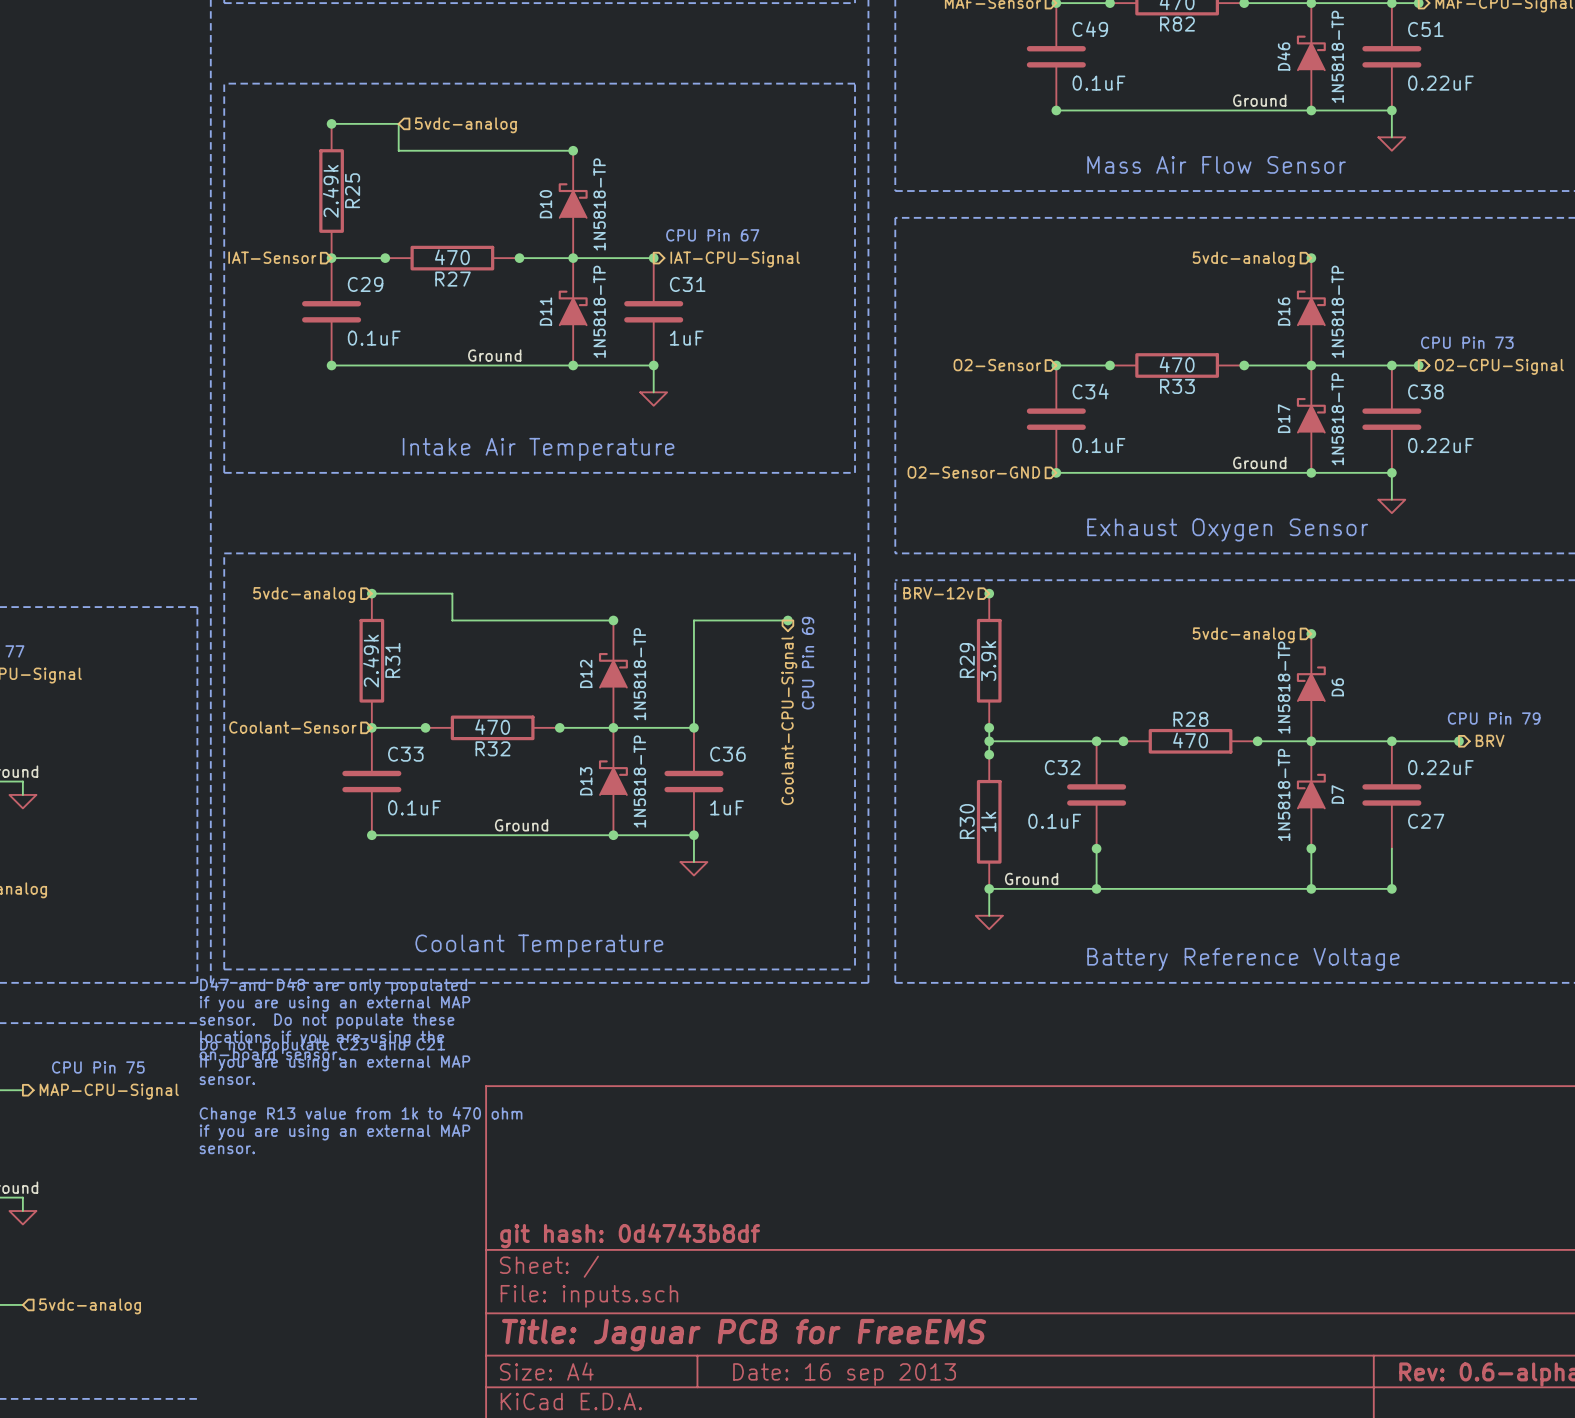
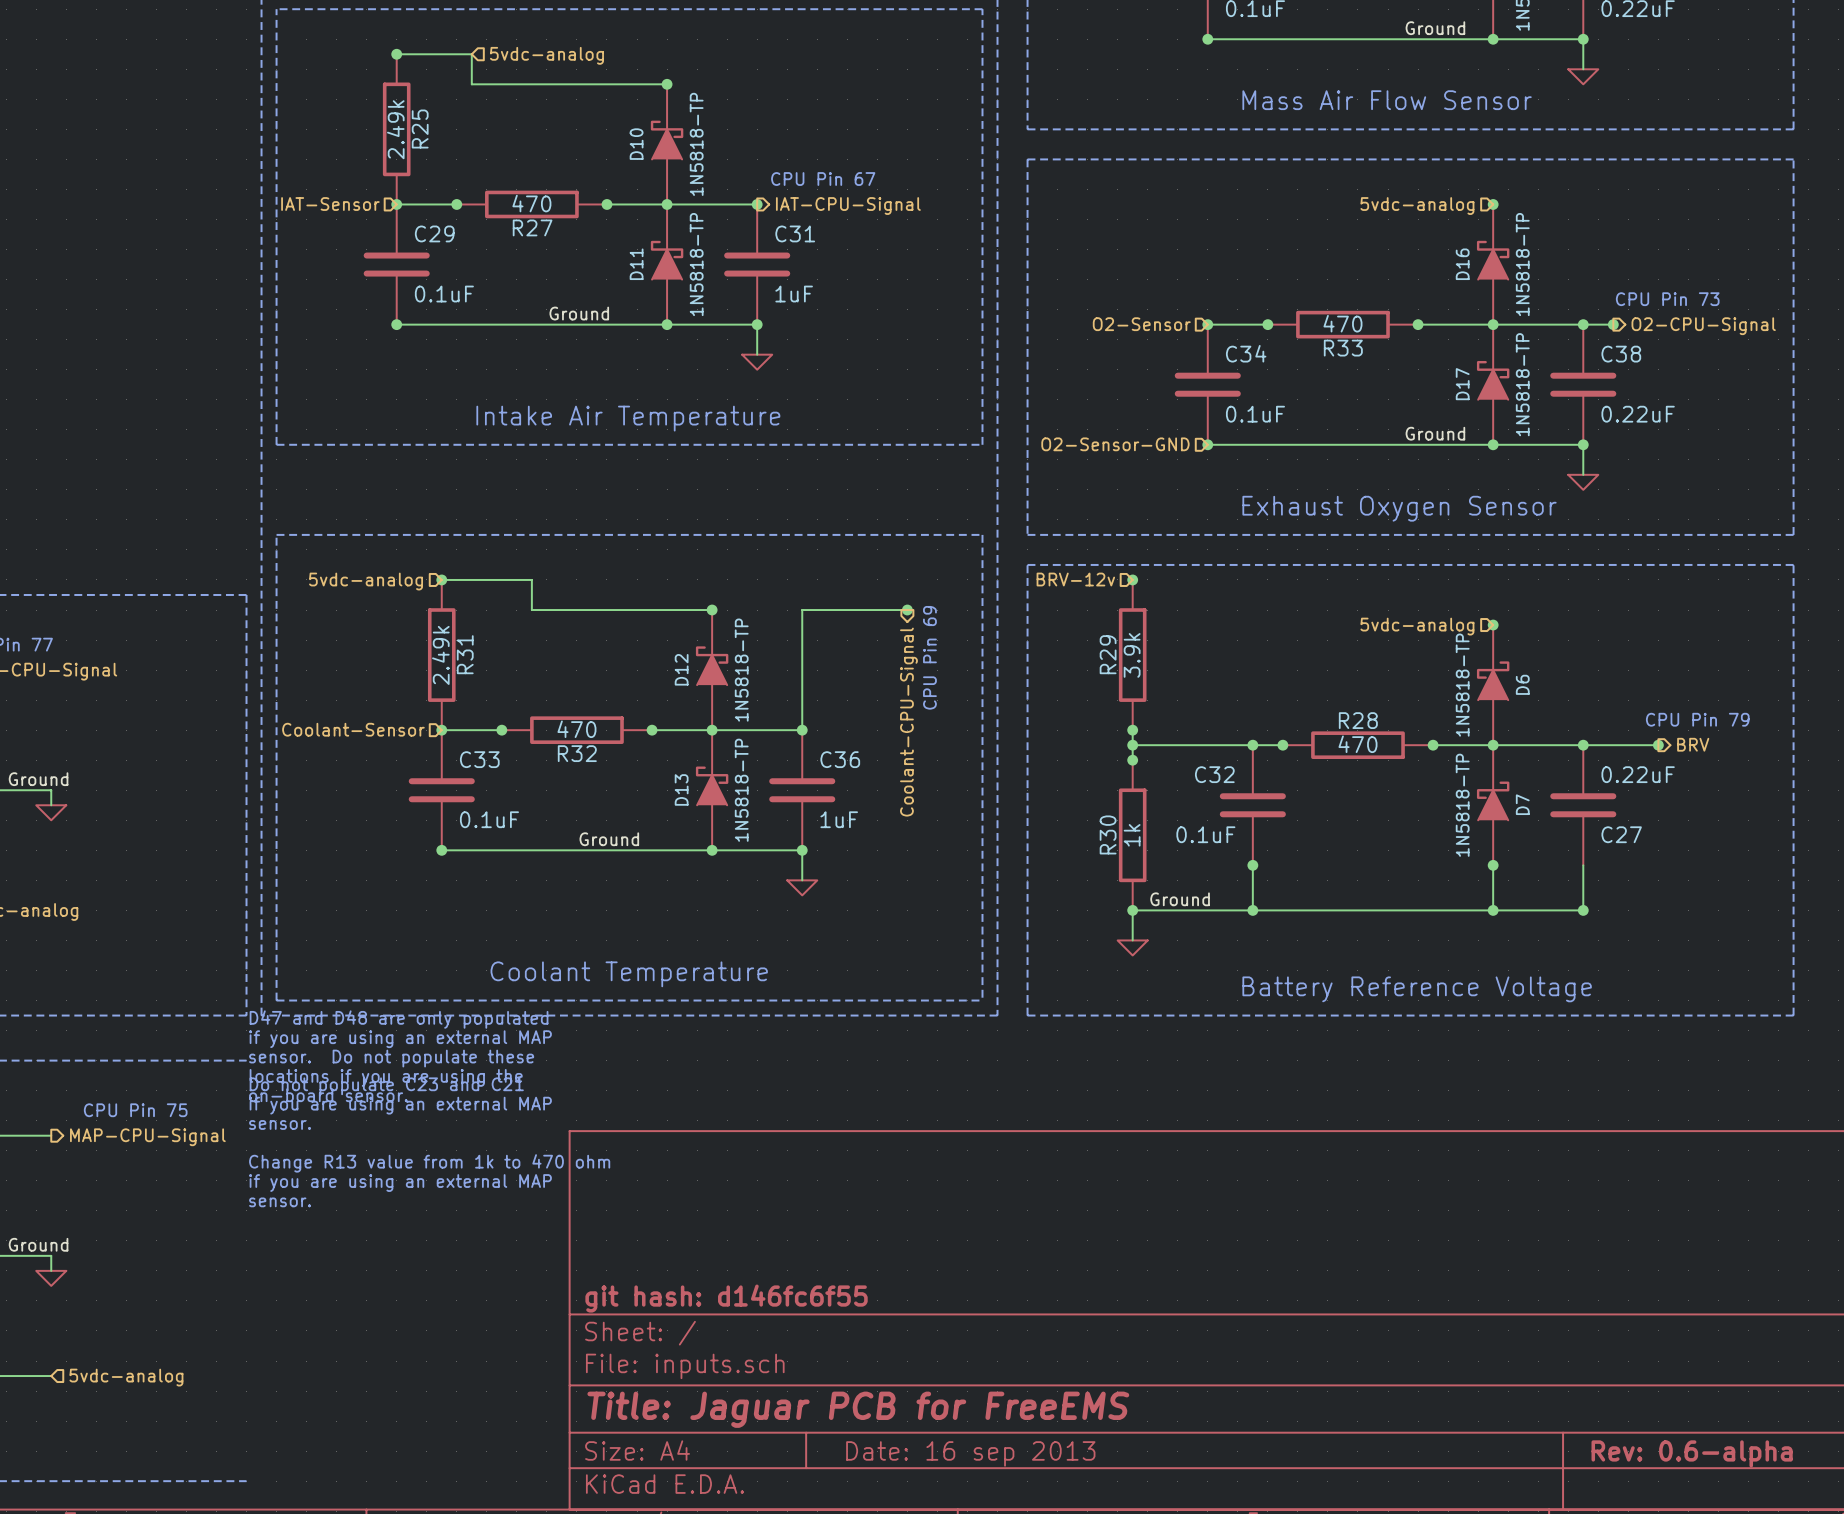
title block: git hash: 0d4743b8df (630, 1235) -> git hash: d146fc6f55 (726, 1298)

